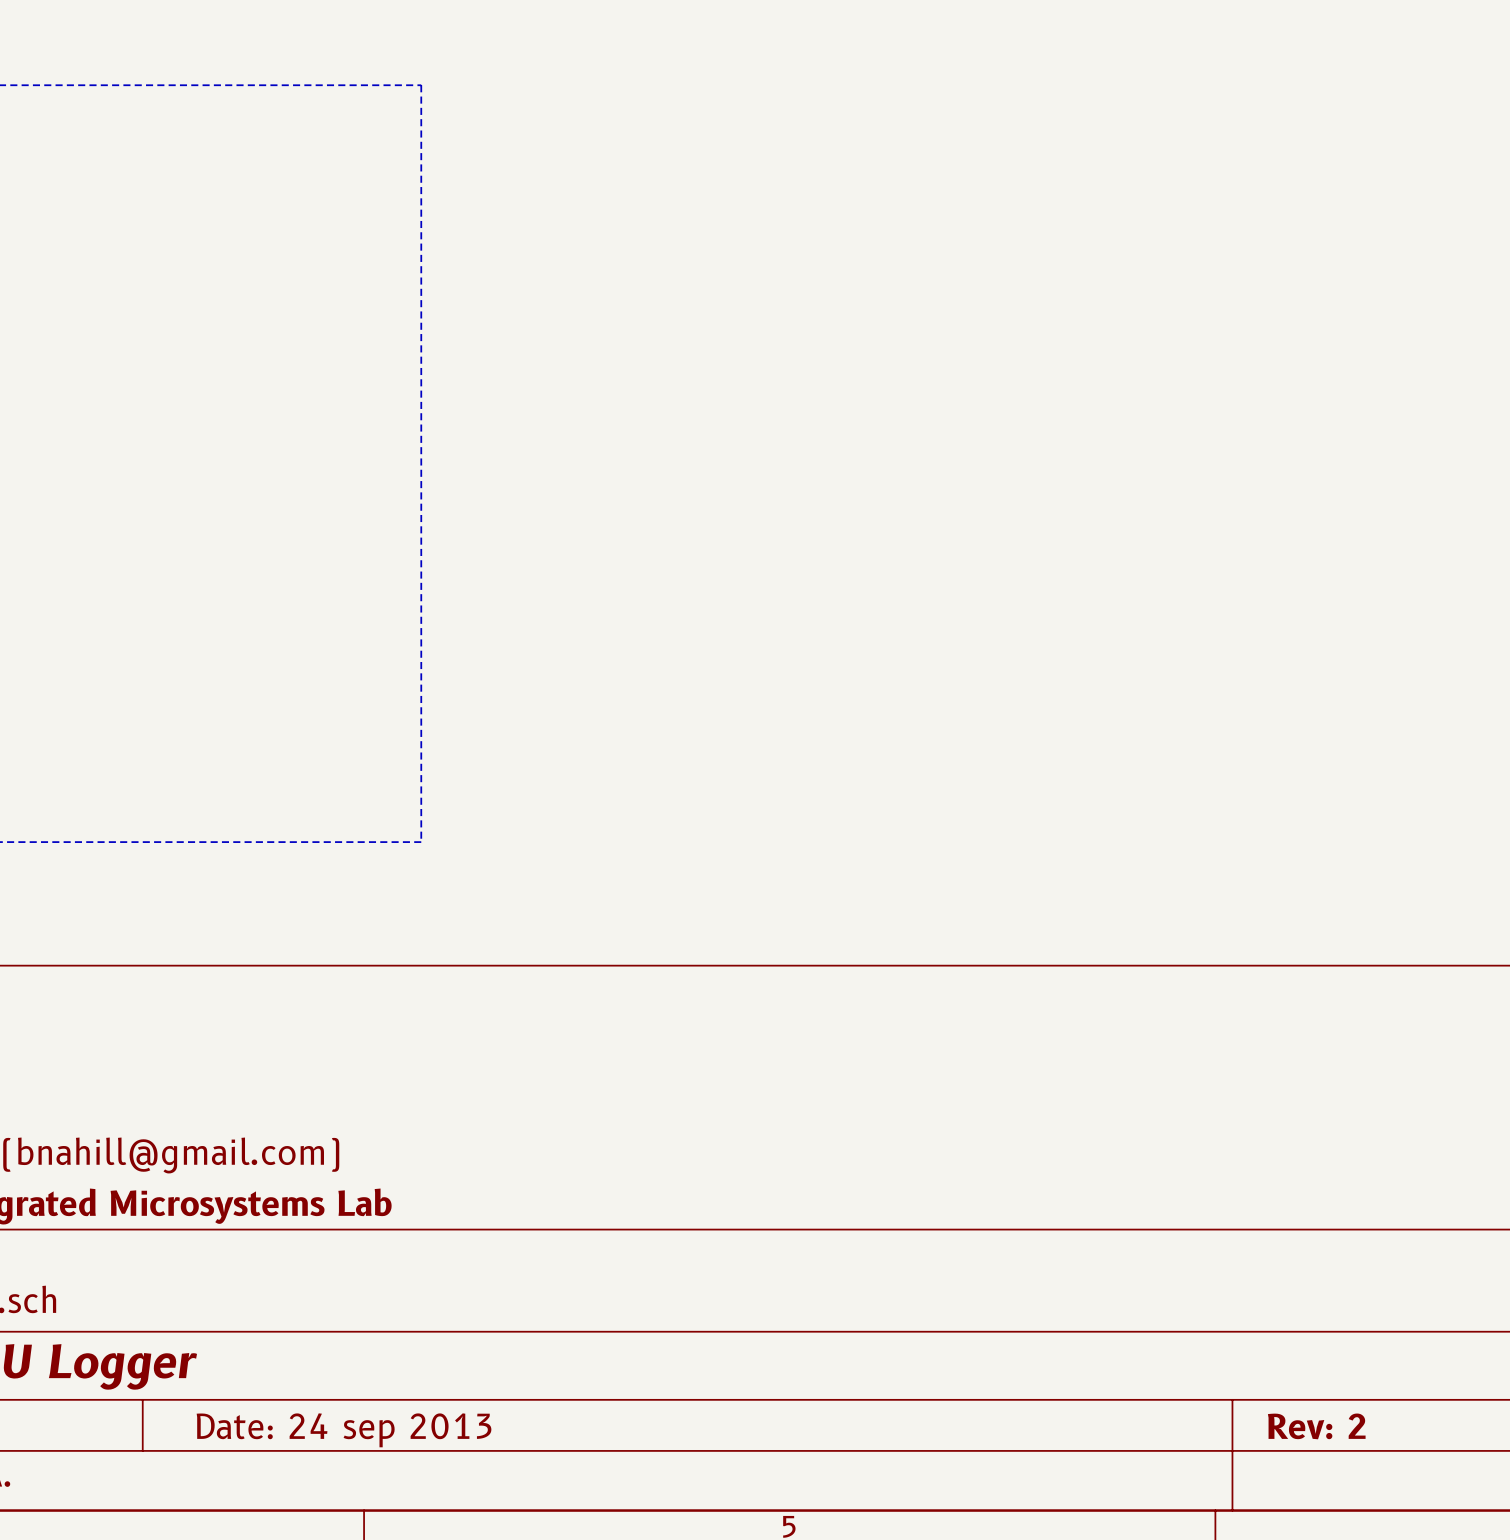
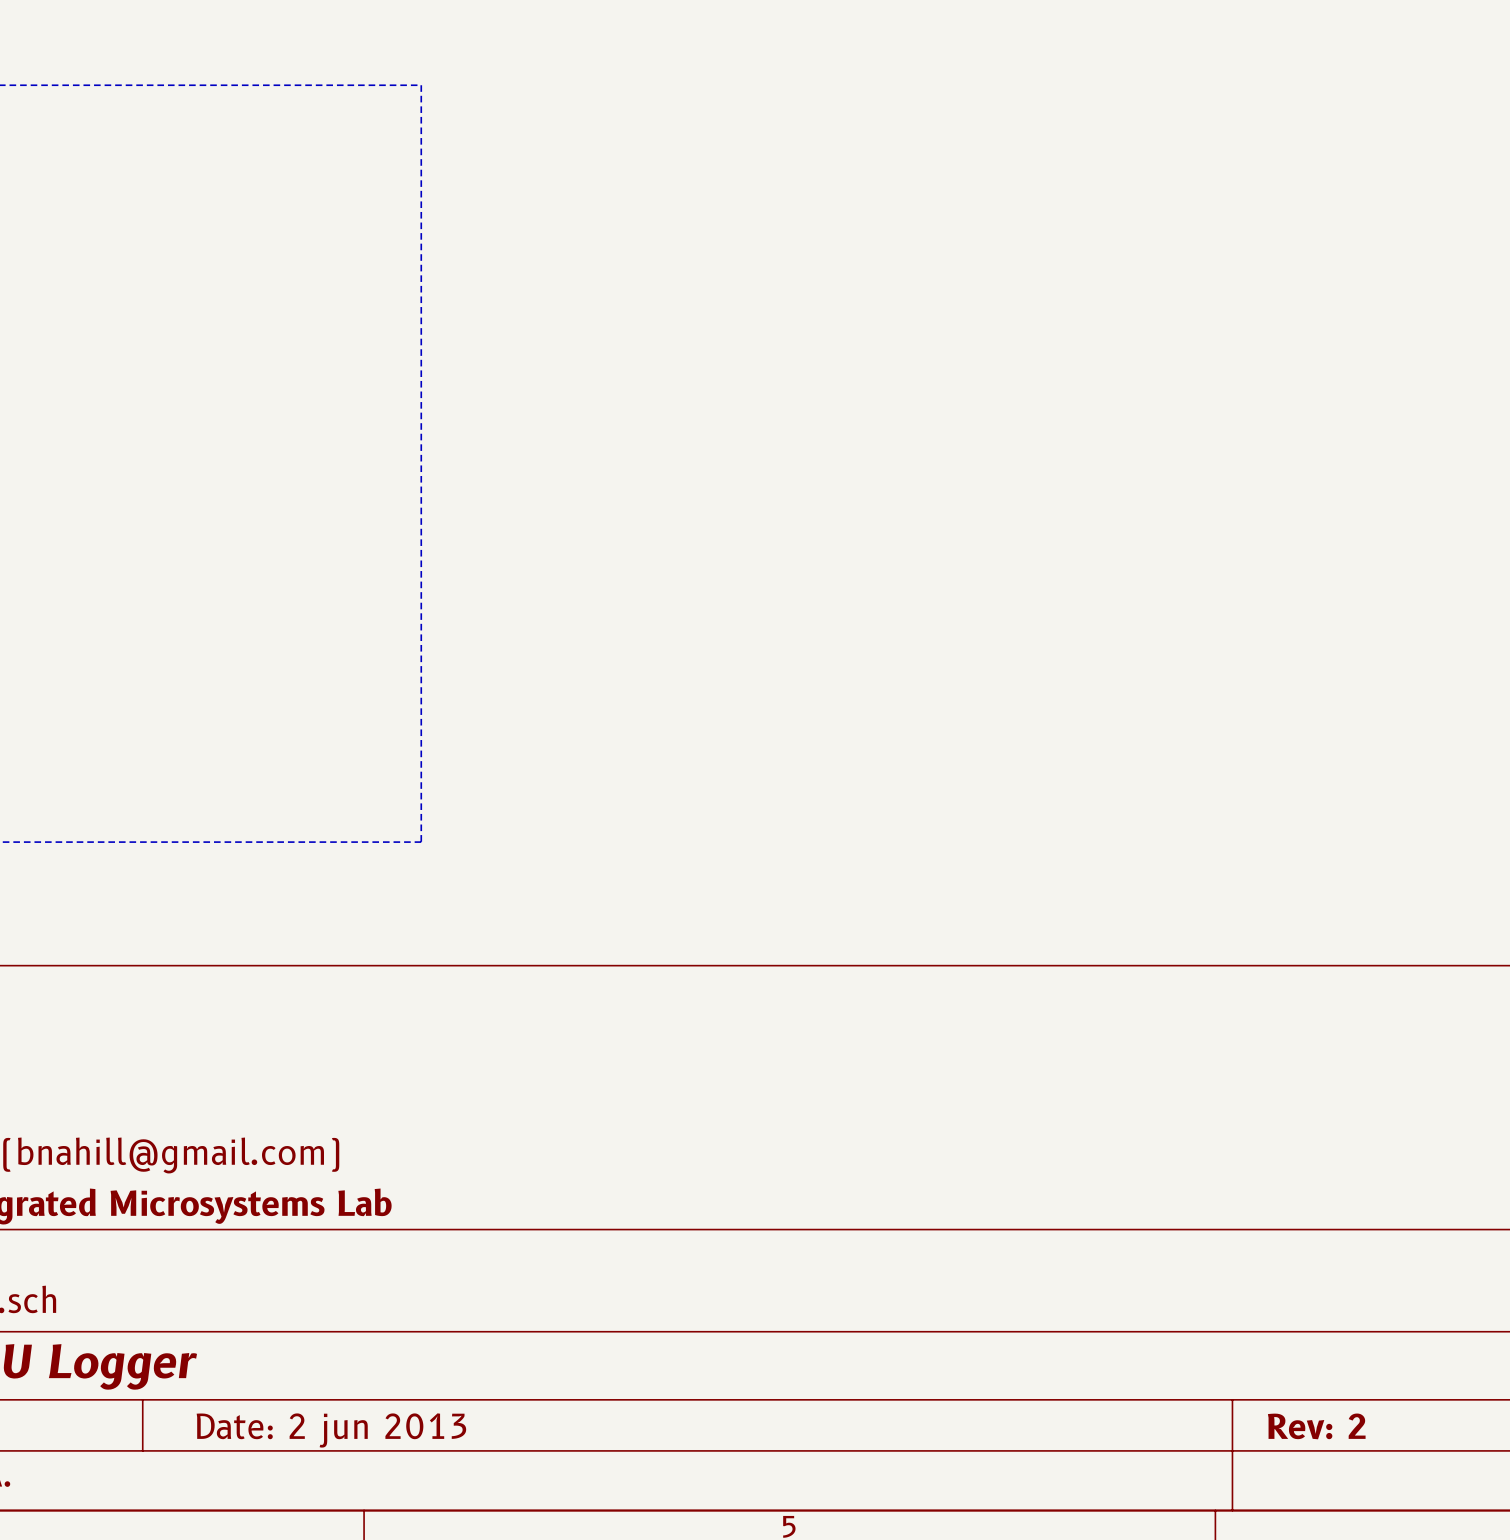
title block: Date: 24 sep 2013 (344, 1430) -> Date: 2 jun 2013 (331, 1430)

